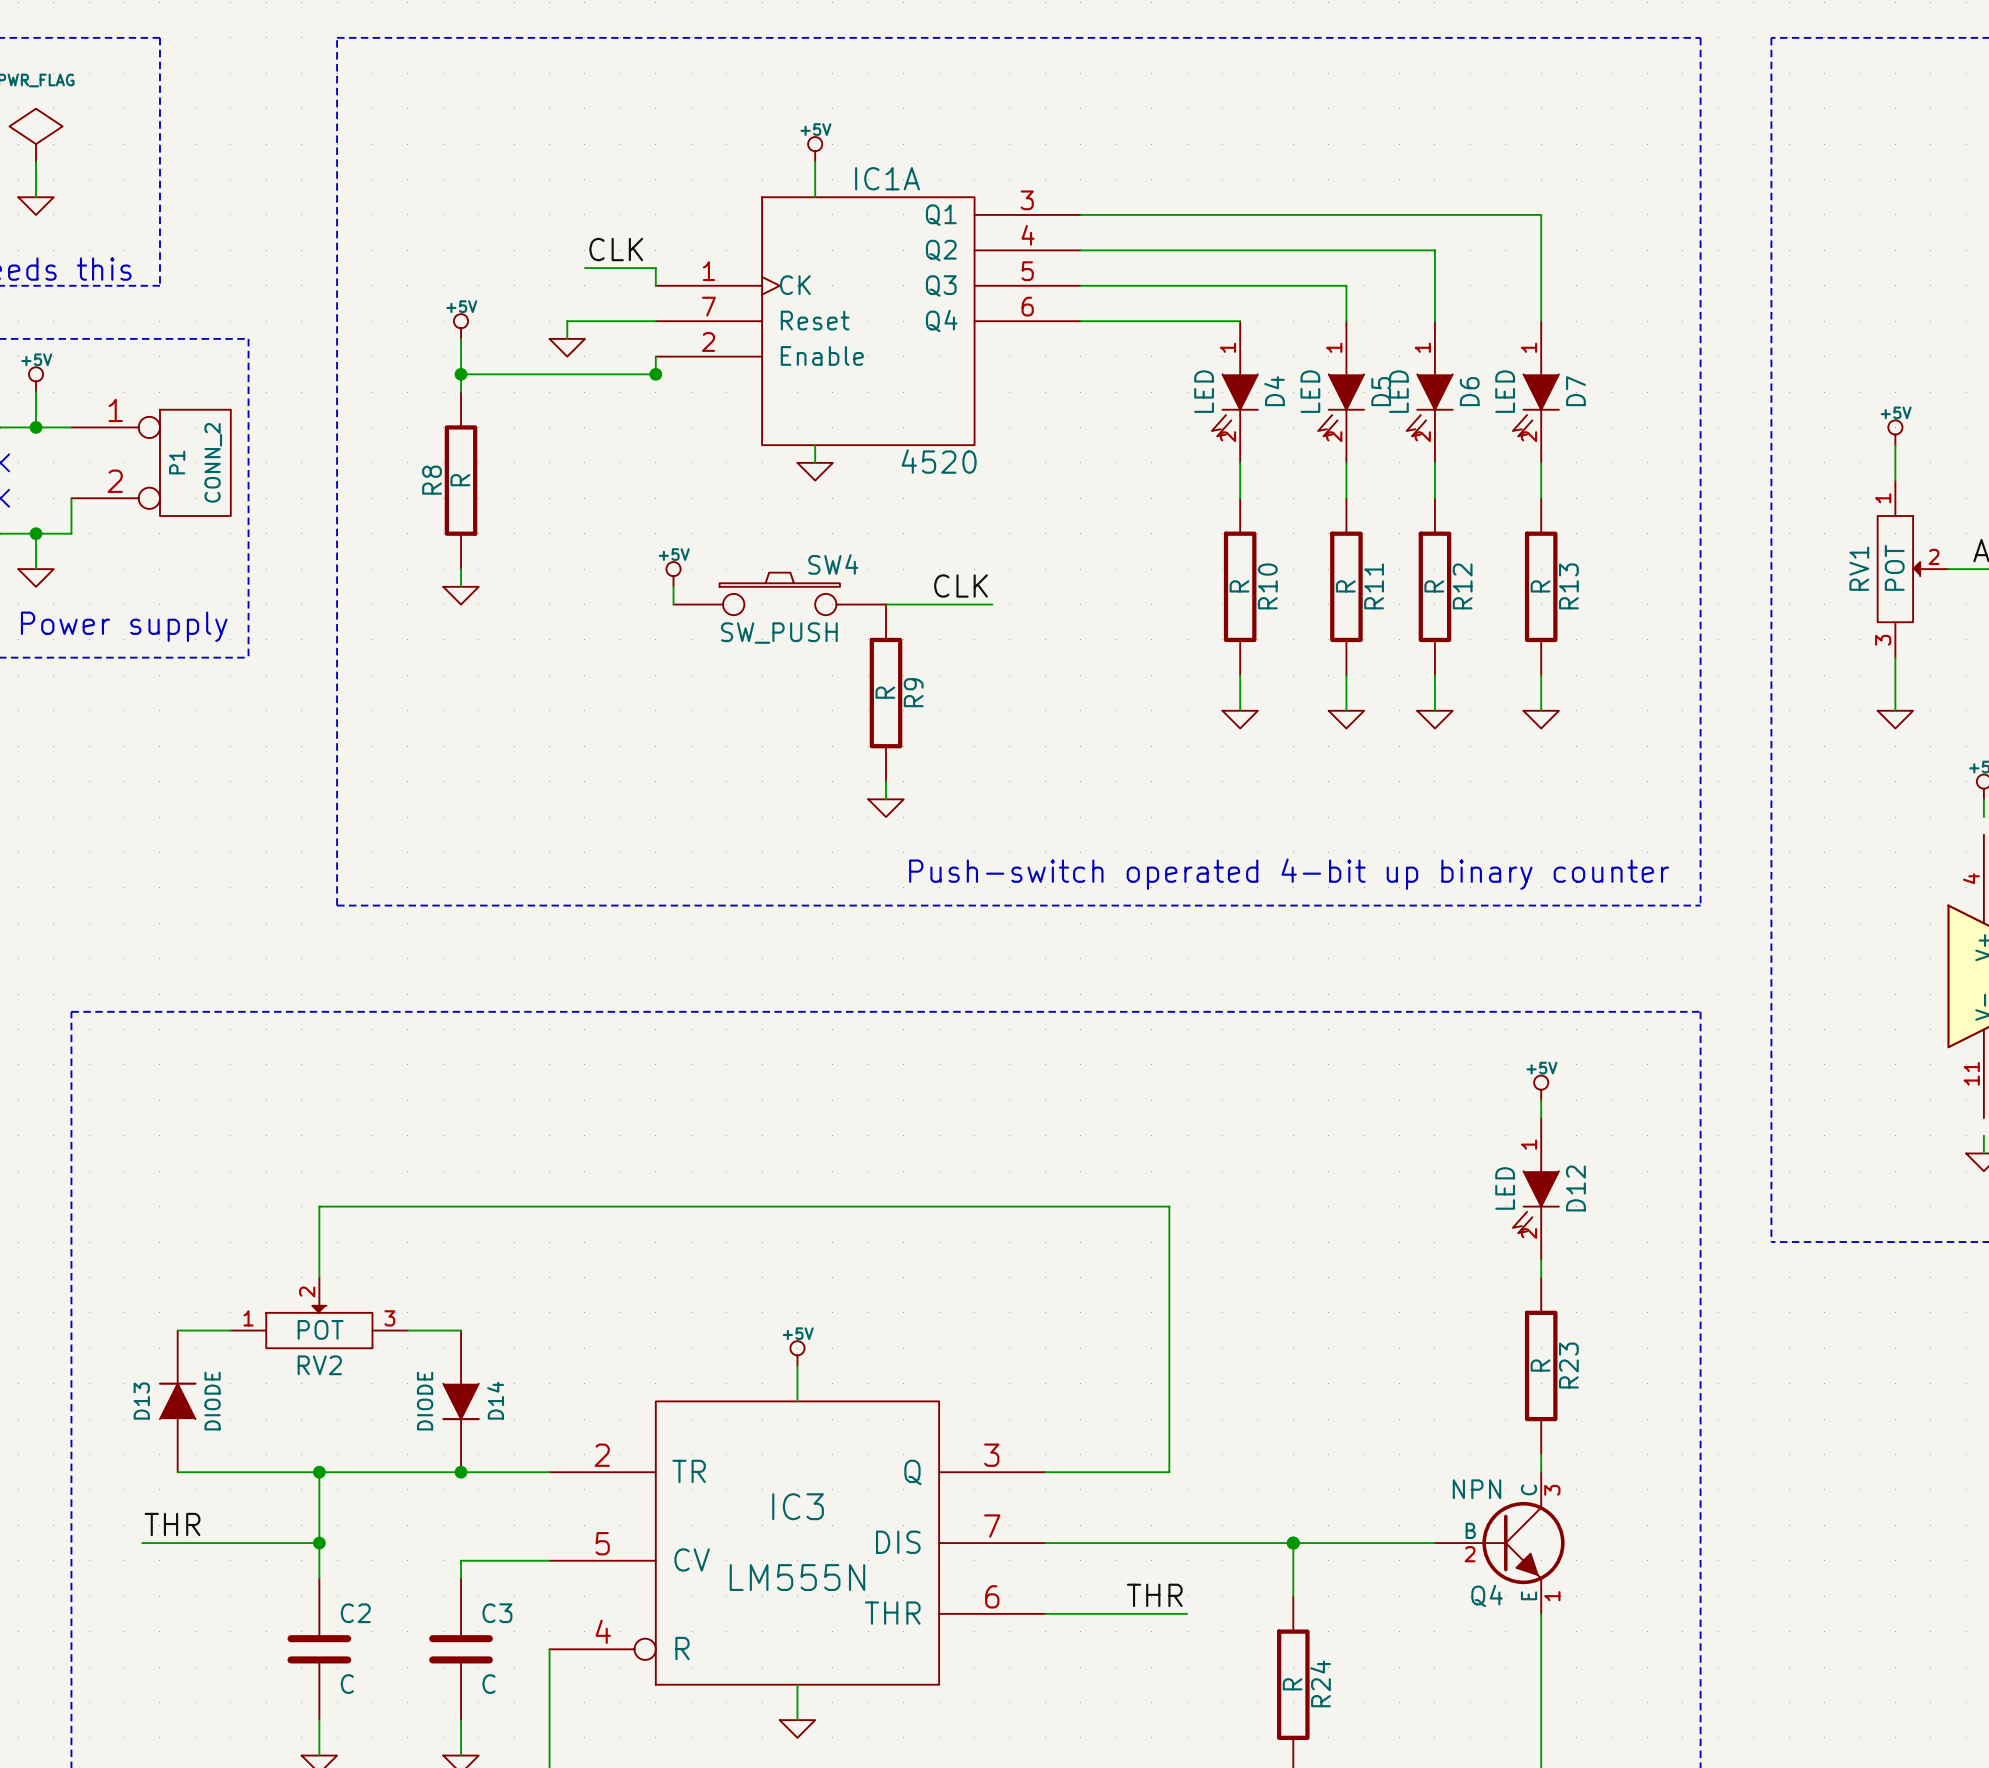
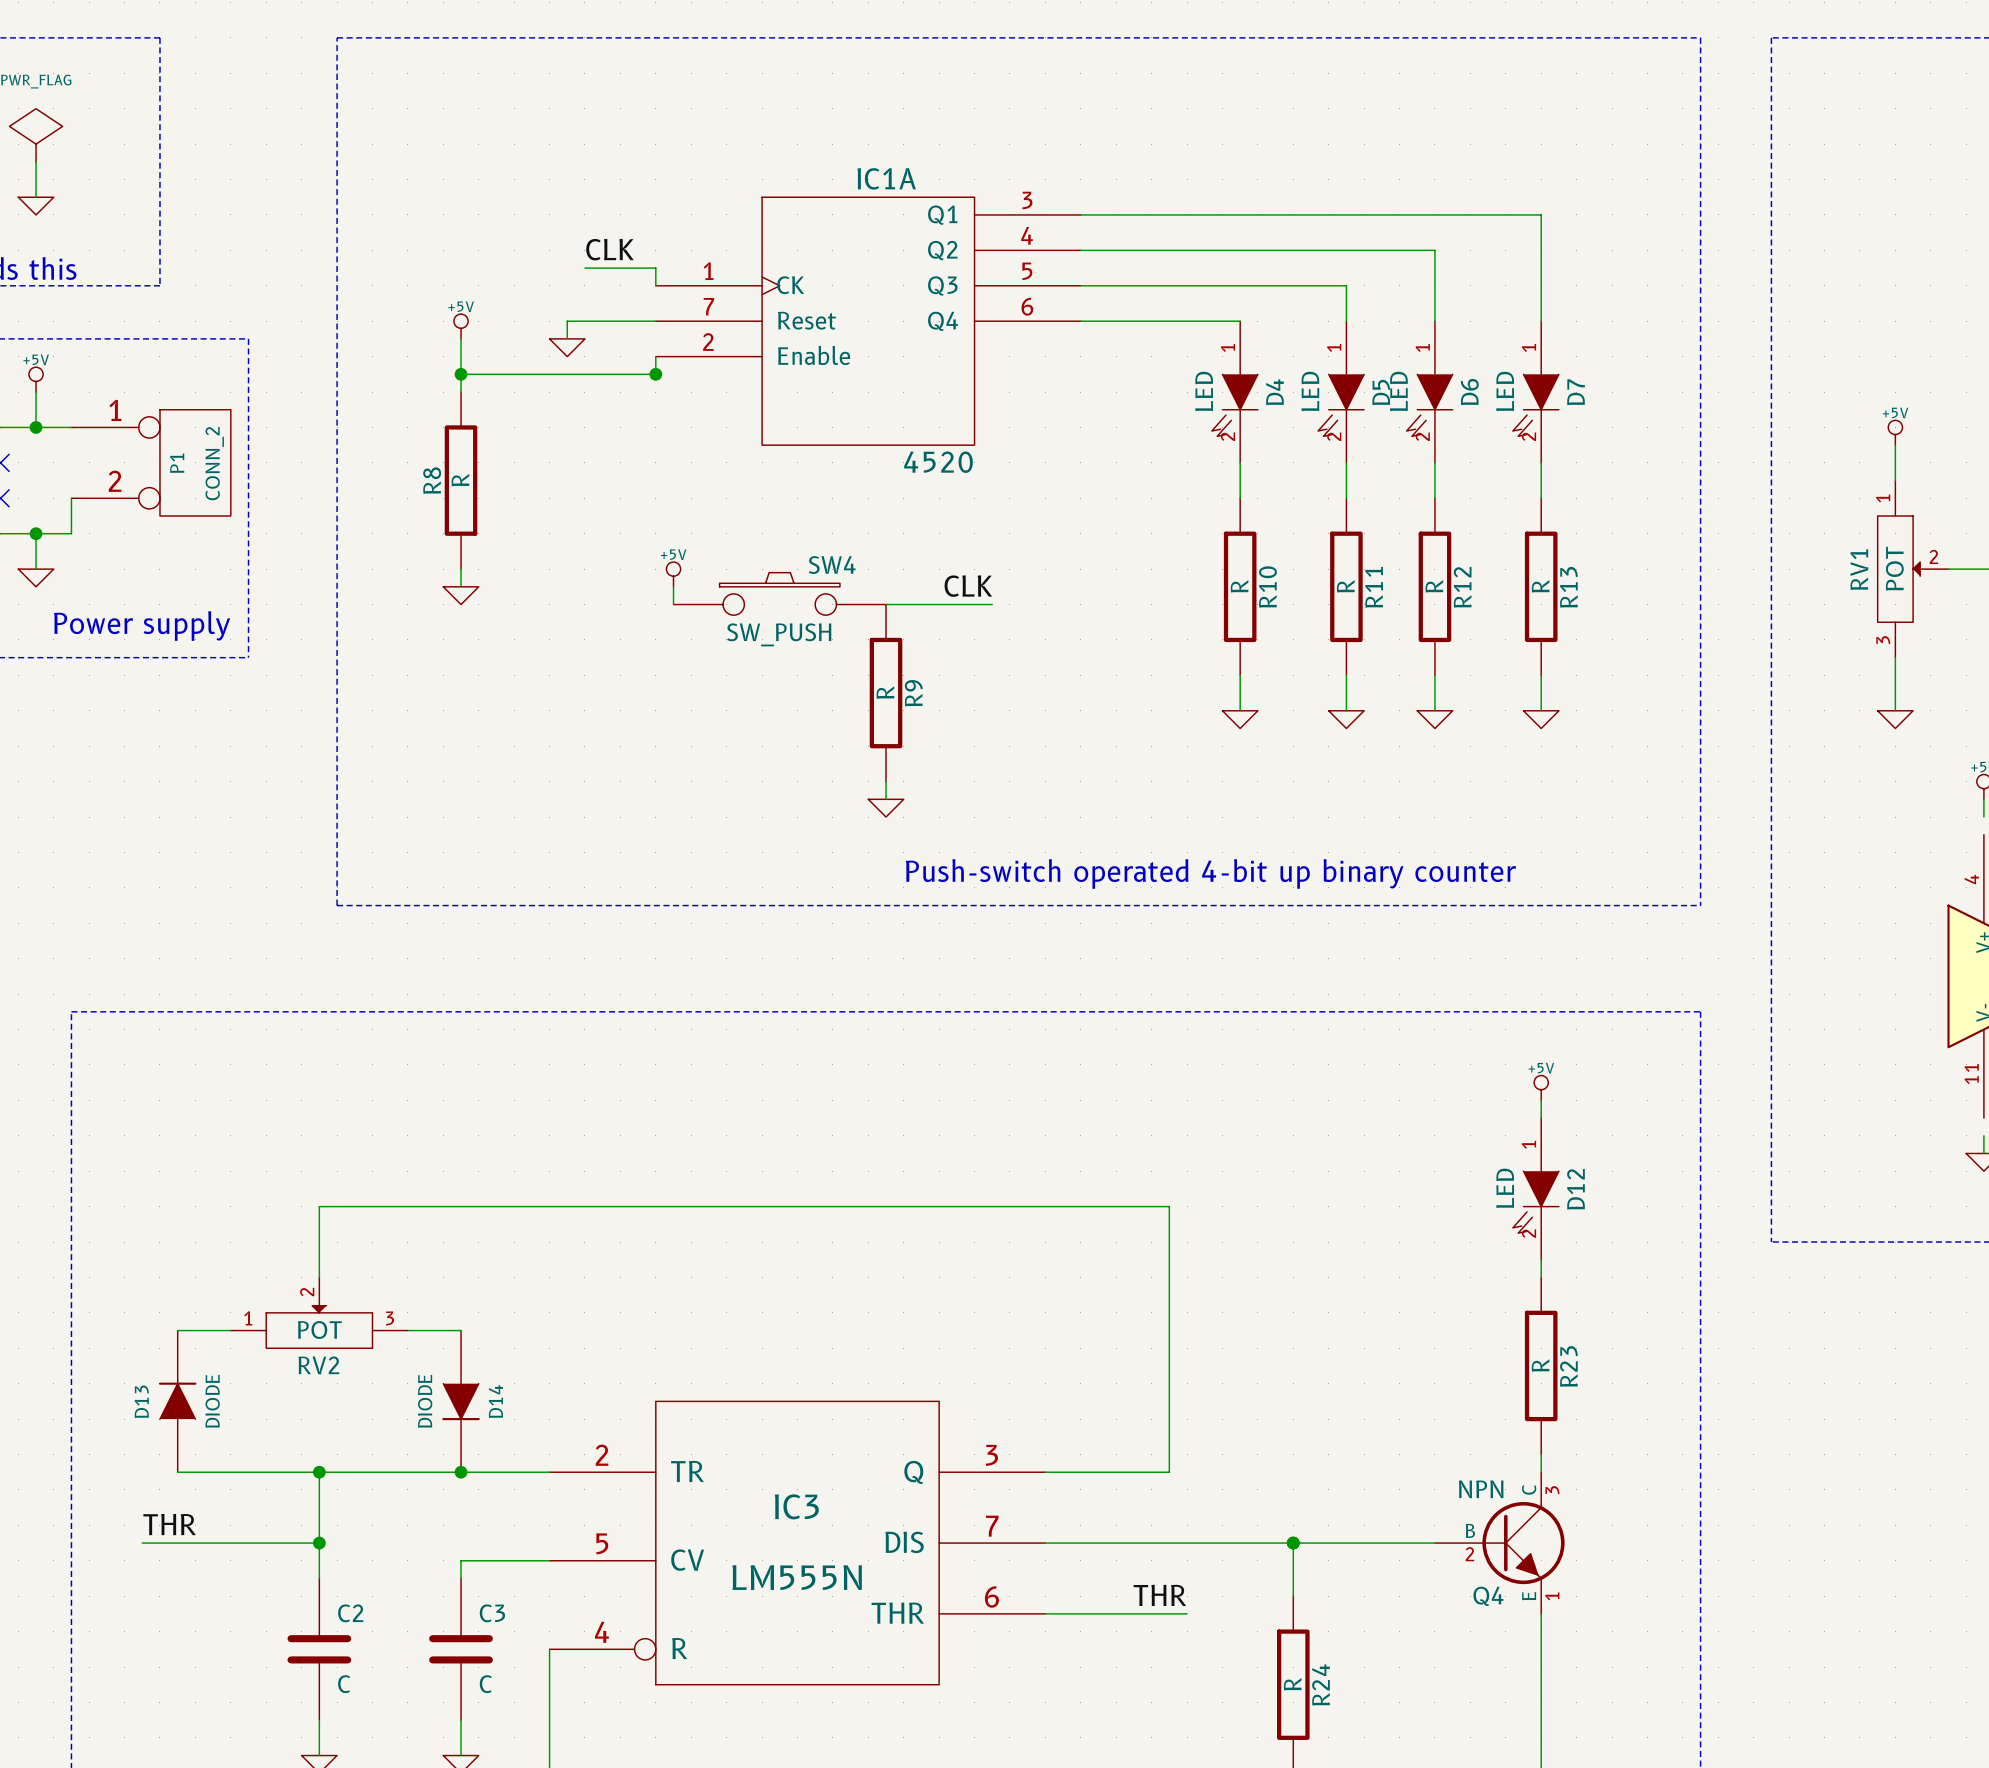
power symbol: +5V (815, 149) -> none
wire: (815, 161) (815, 197) -> none
wire: (815, 445) (815, 462) -> none
power symbol: (815, 471) -> none
power symbol: +5V (797, 1353) -> none
wire: (797, 1365) (797, 1401) -> none
wire: (797, 1684) (797, 1720) -> none
power symbol: (797, 1728) -> none

